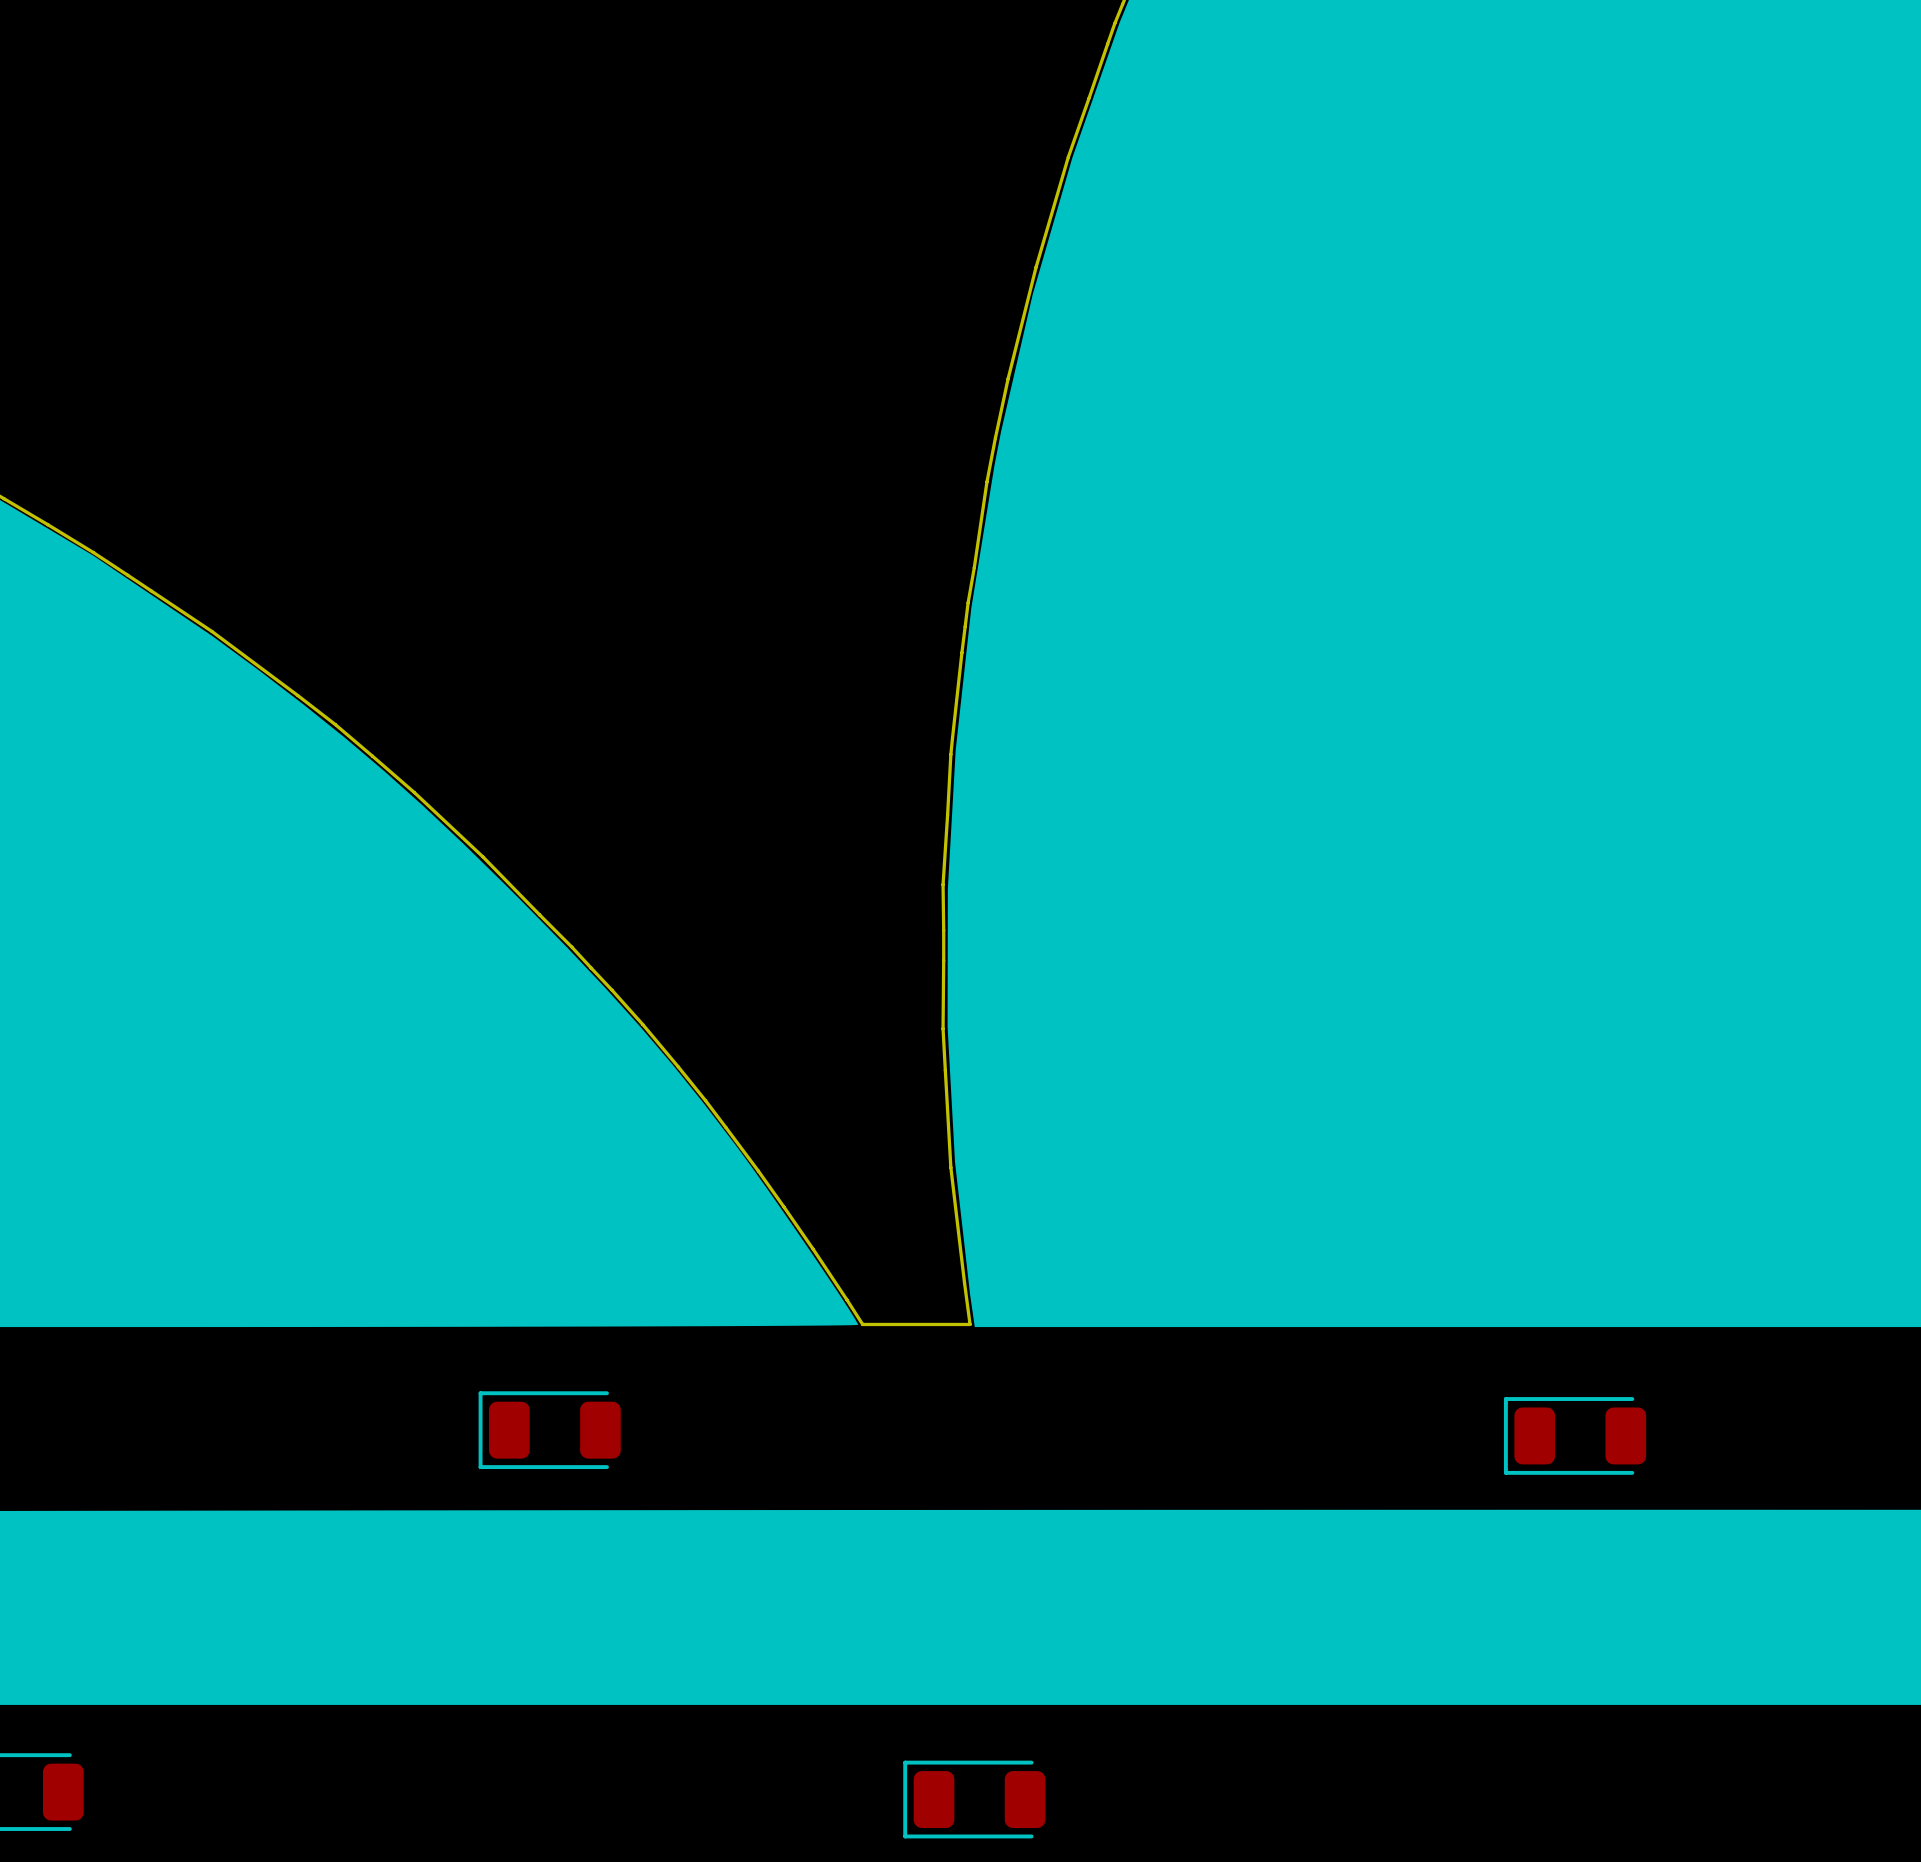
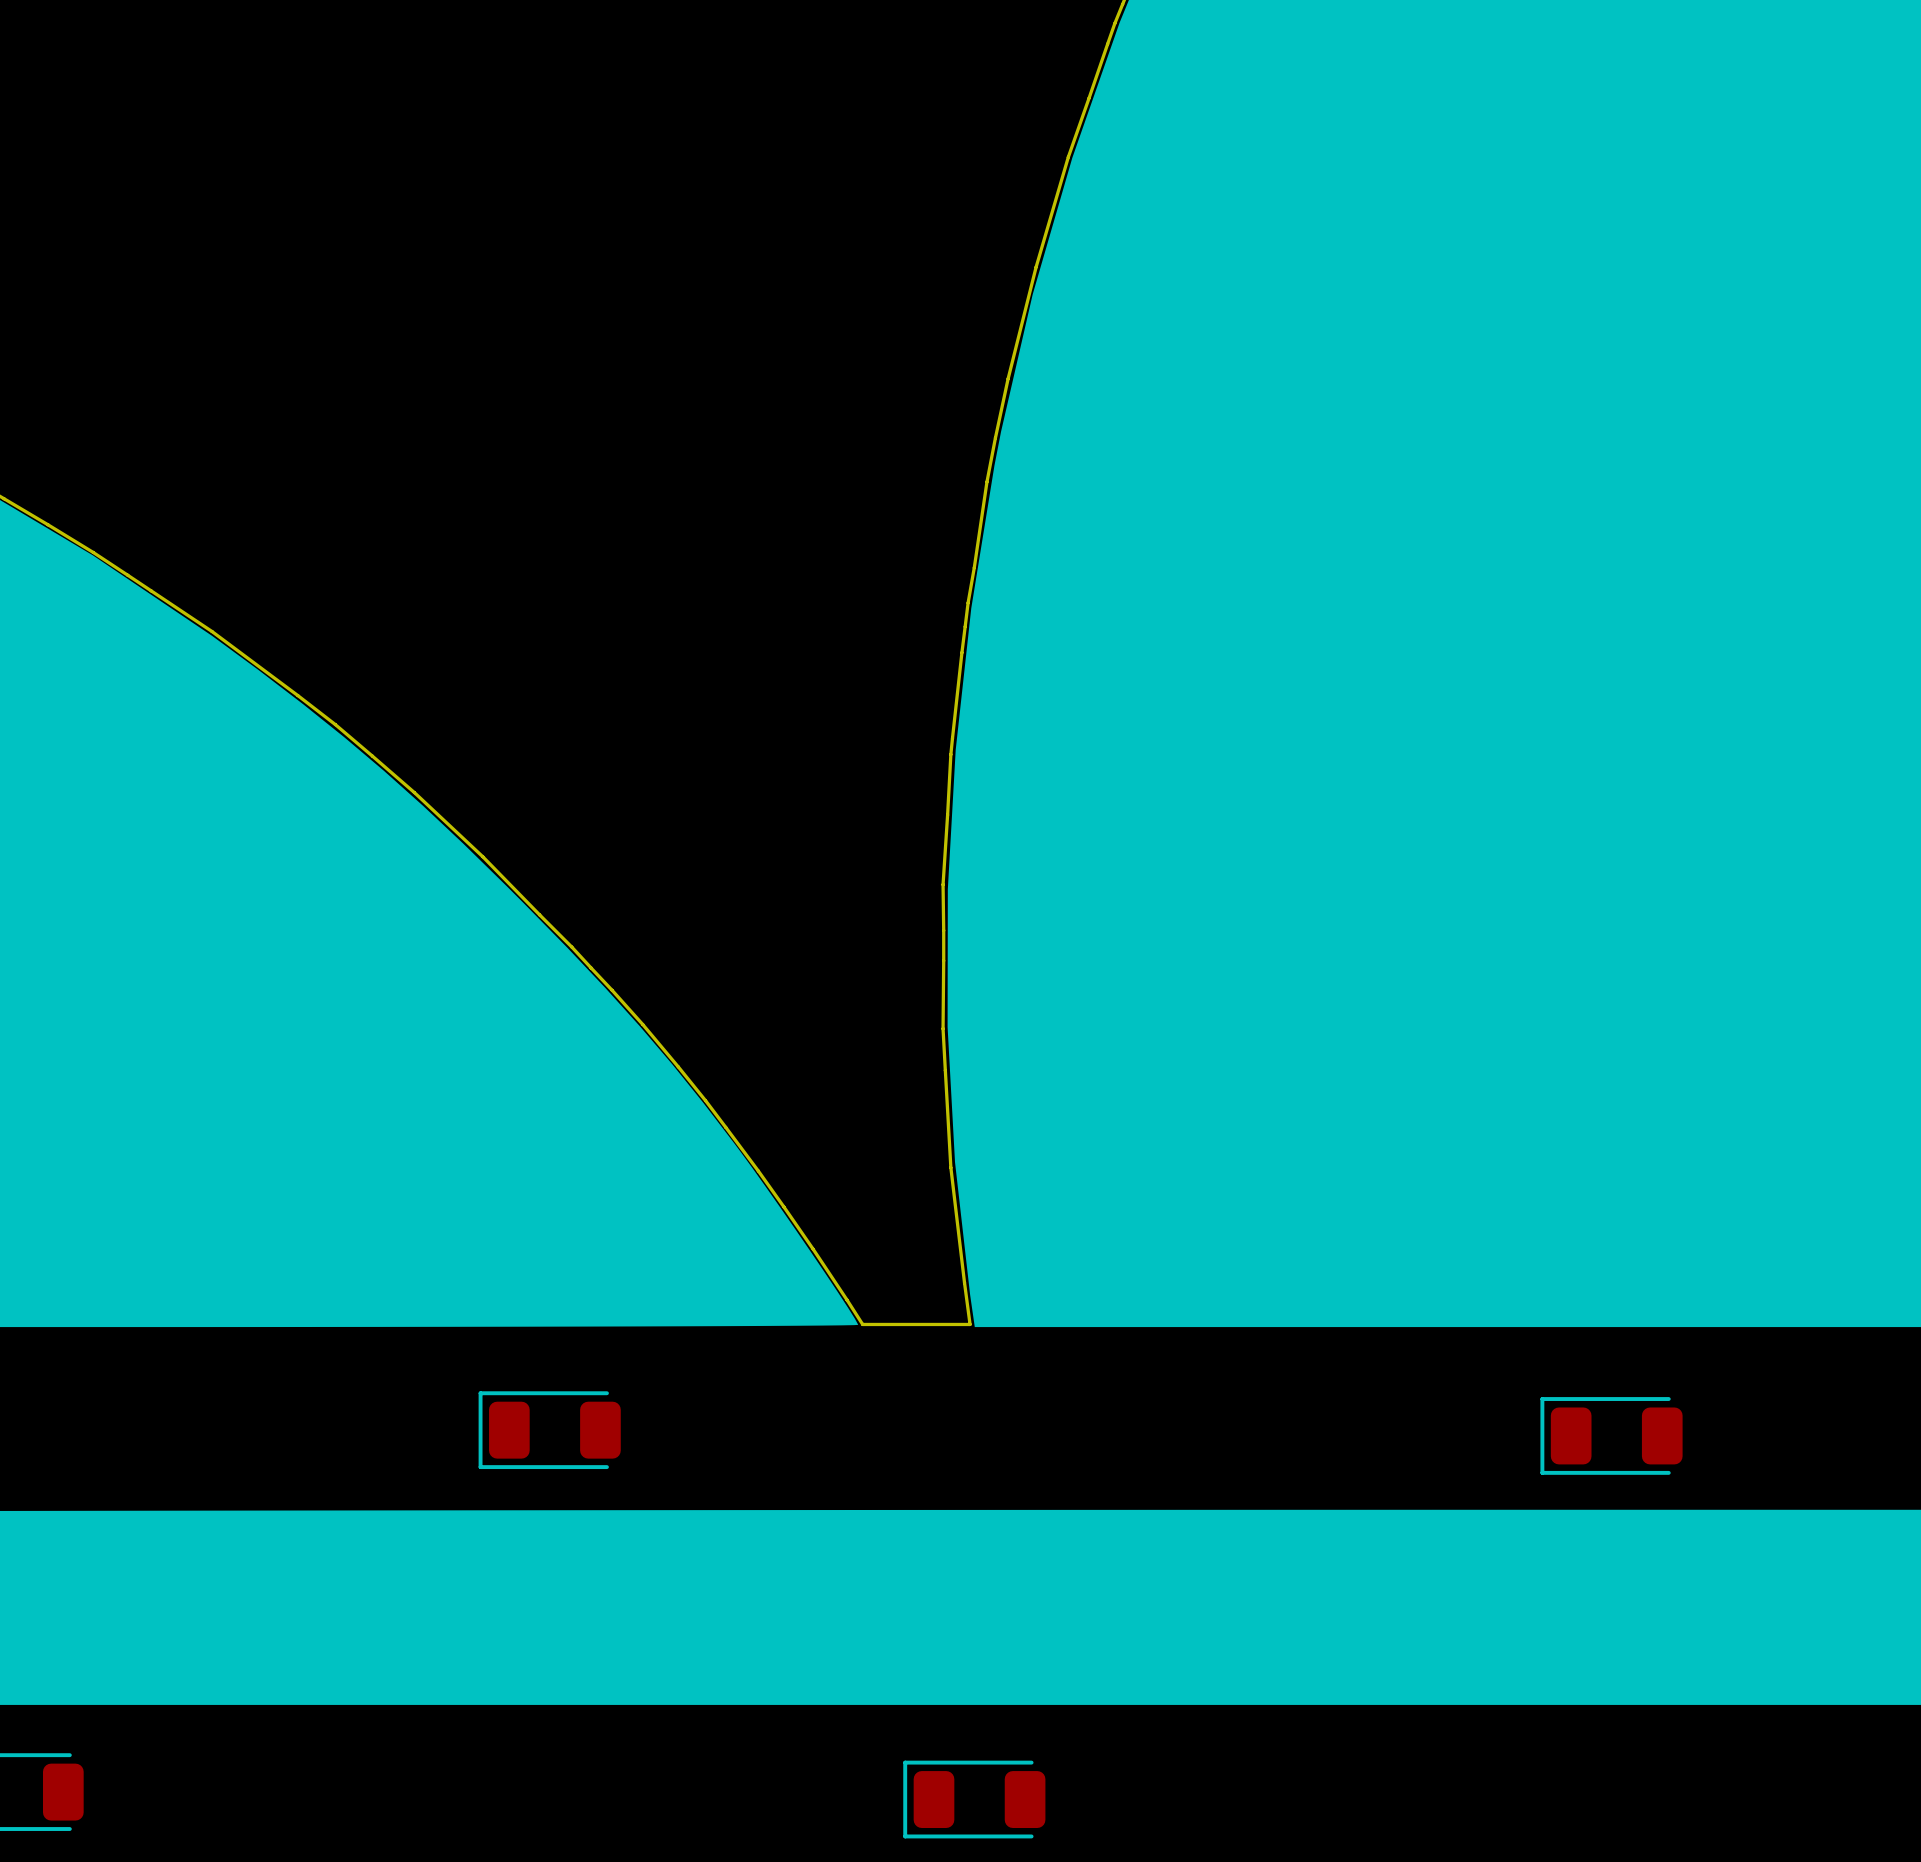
part position: (1575, 1435) -> (1611, 1435)

